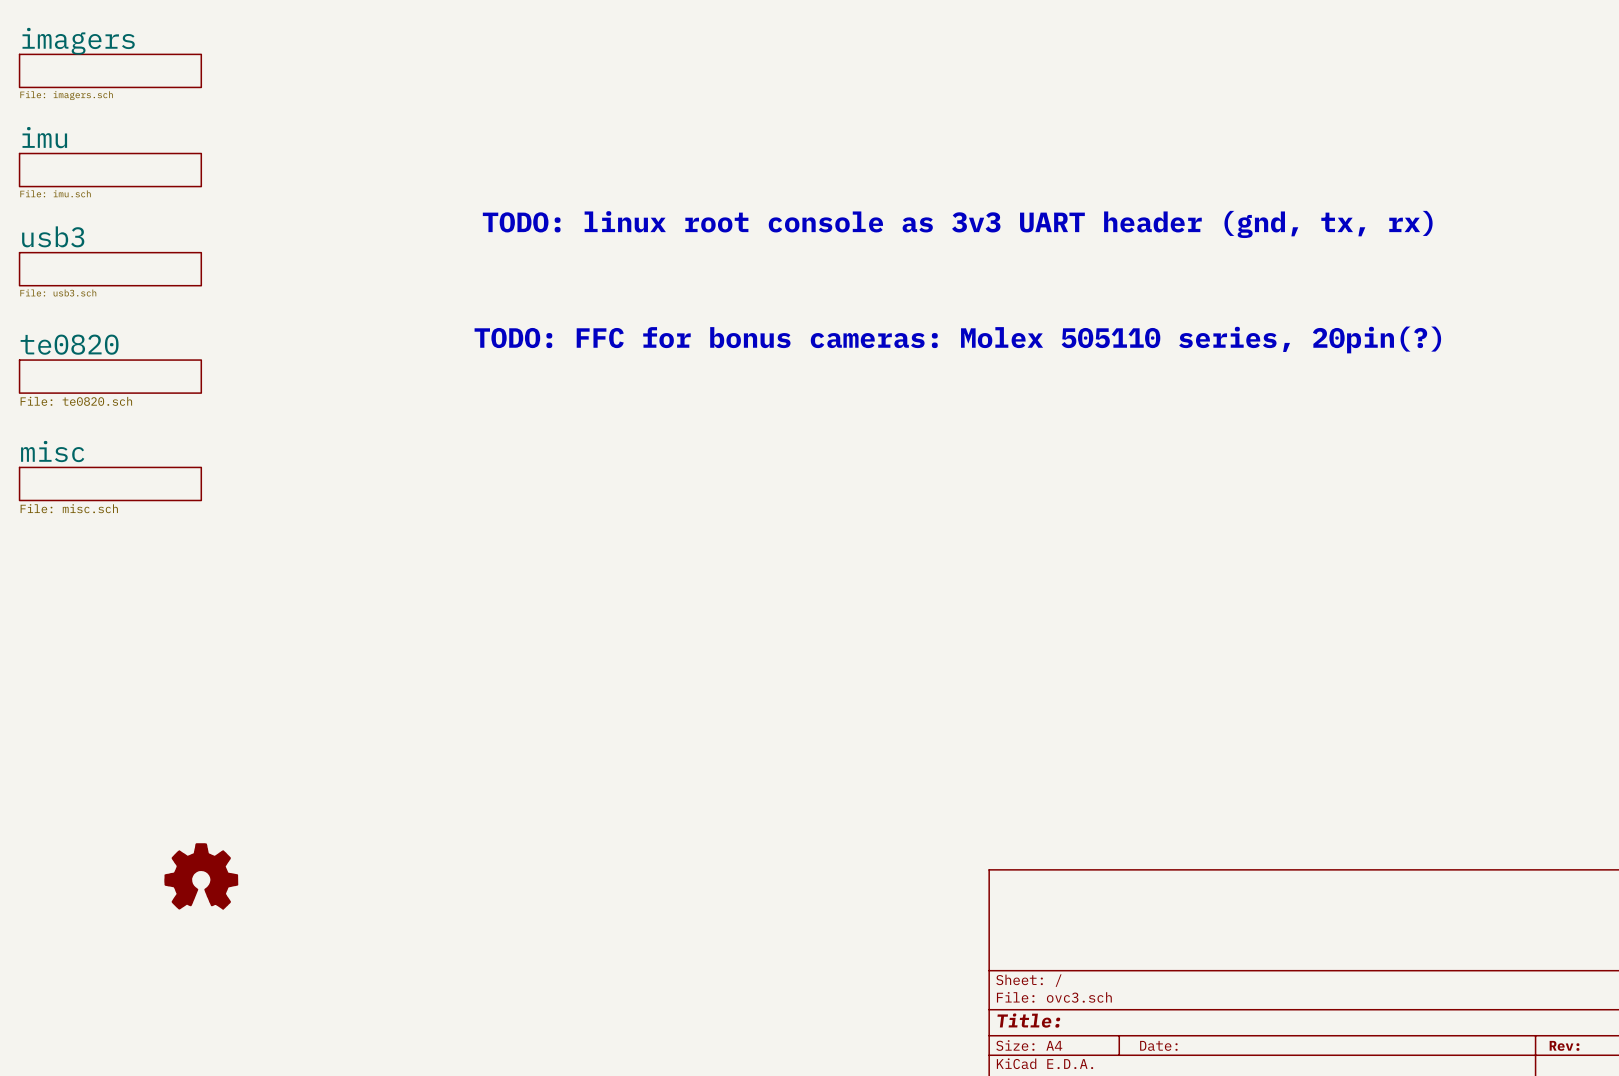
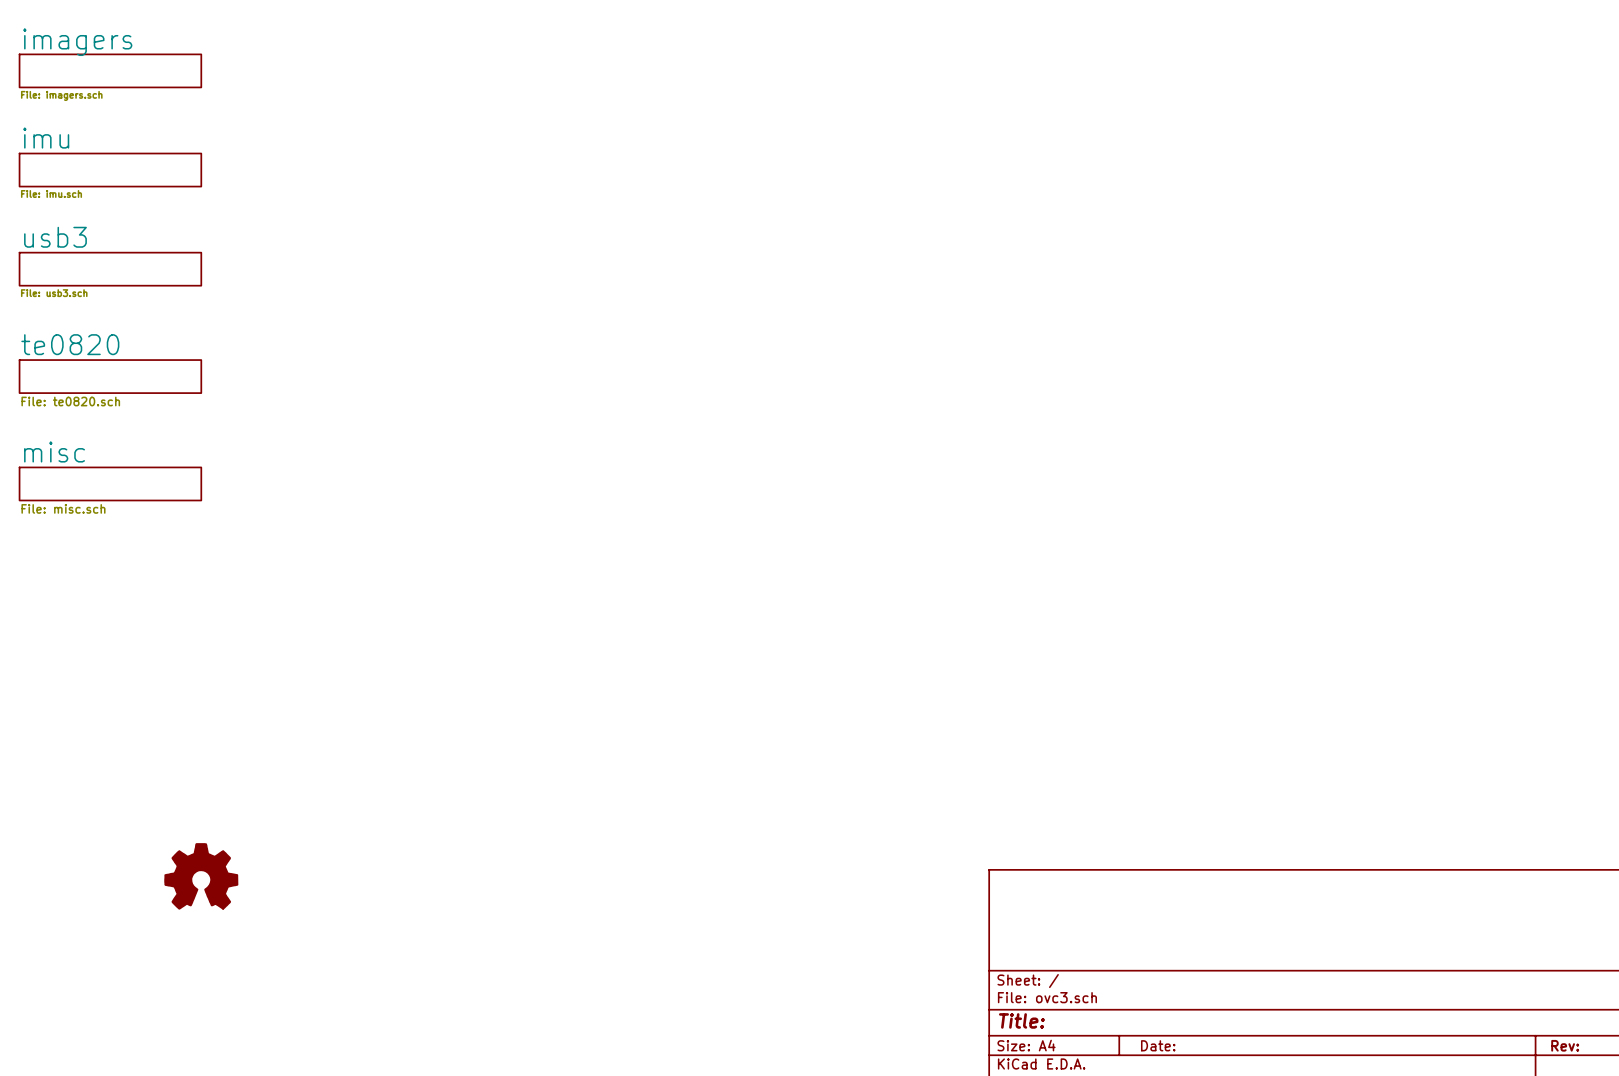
text: TODO: linux root console as 3v3 UART header (gnd, tx, rx) (957, 224) -> none
text: TODO: FFC for bonus cameras: Molex 505110 series, 20pin(?) (957, 339) -> none

